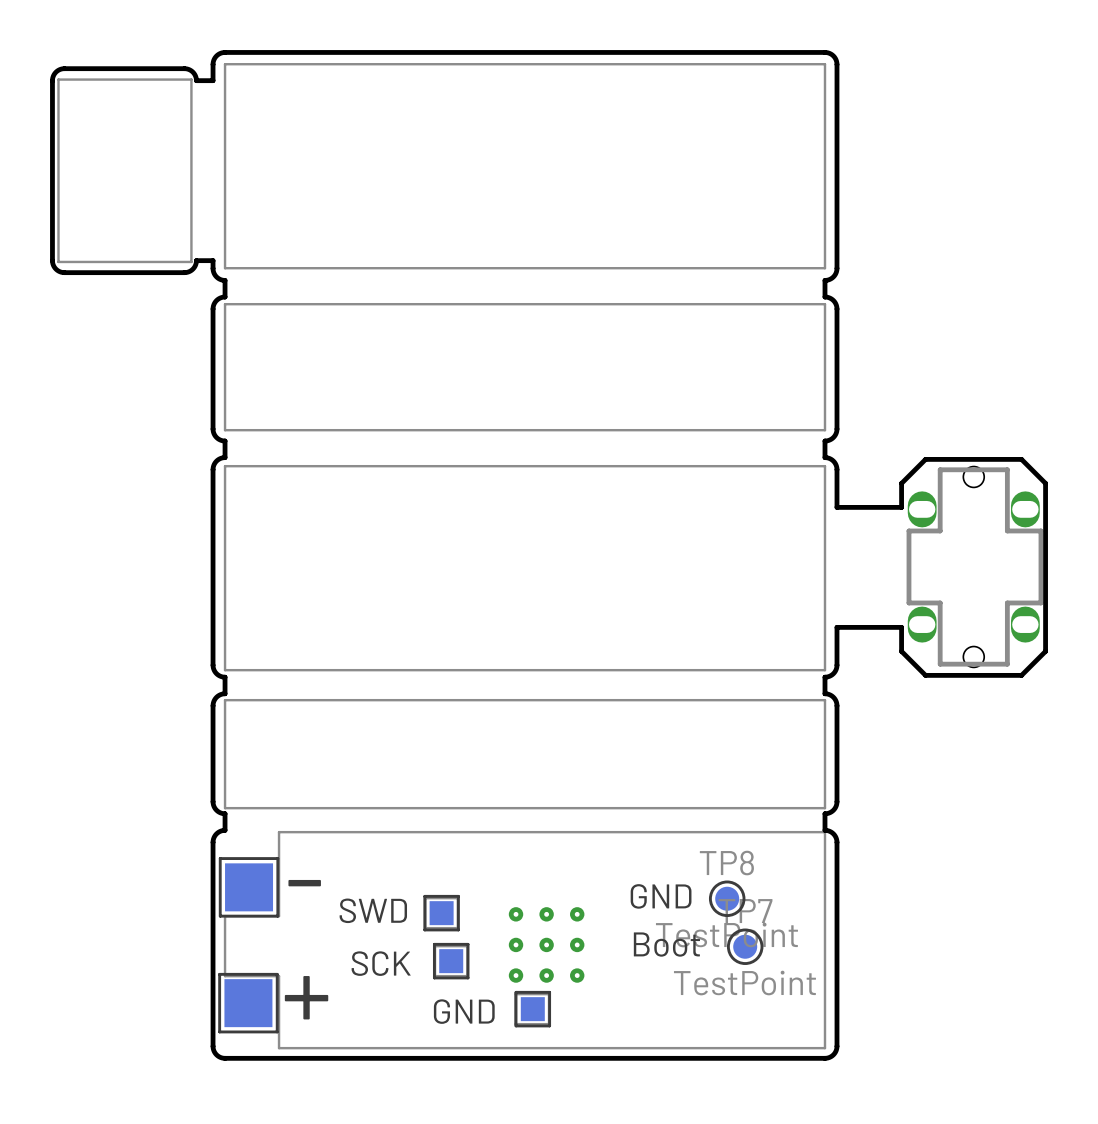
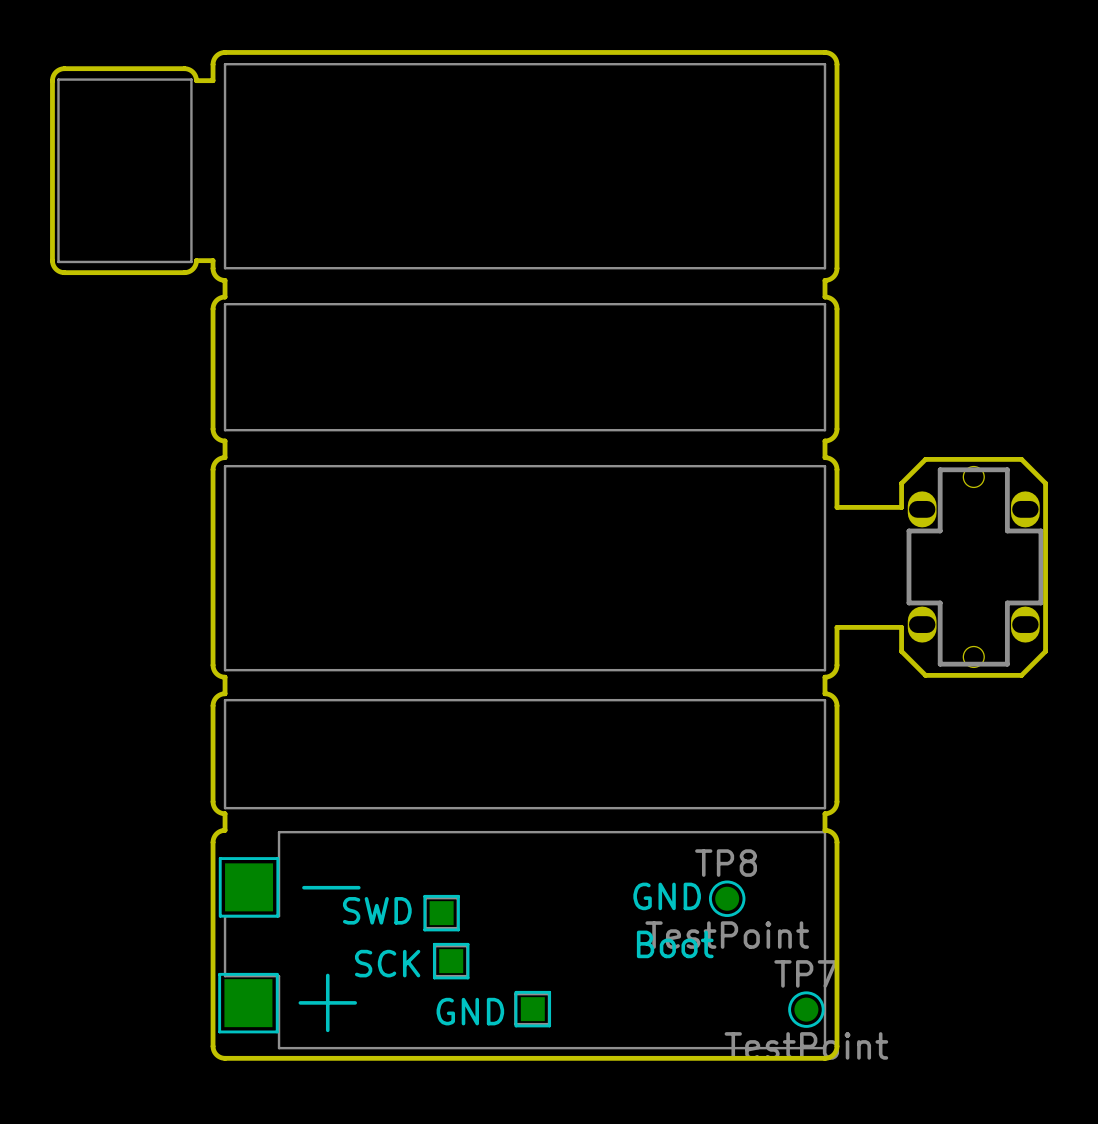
part: (546, 944) -> none
TP7 position: (745, 946) -> (806, 1009)

